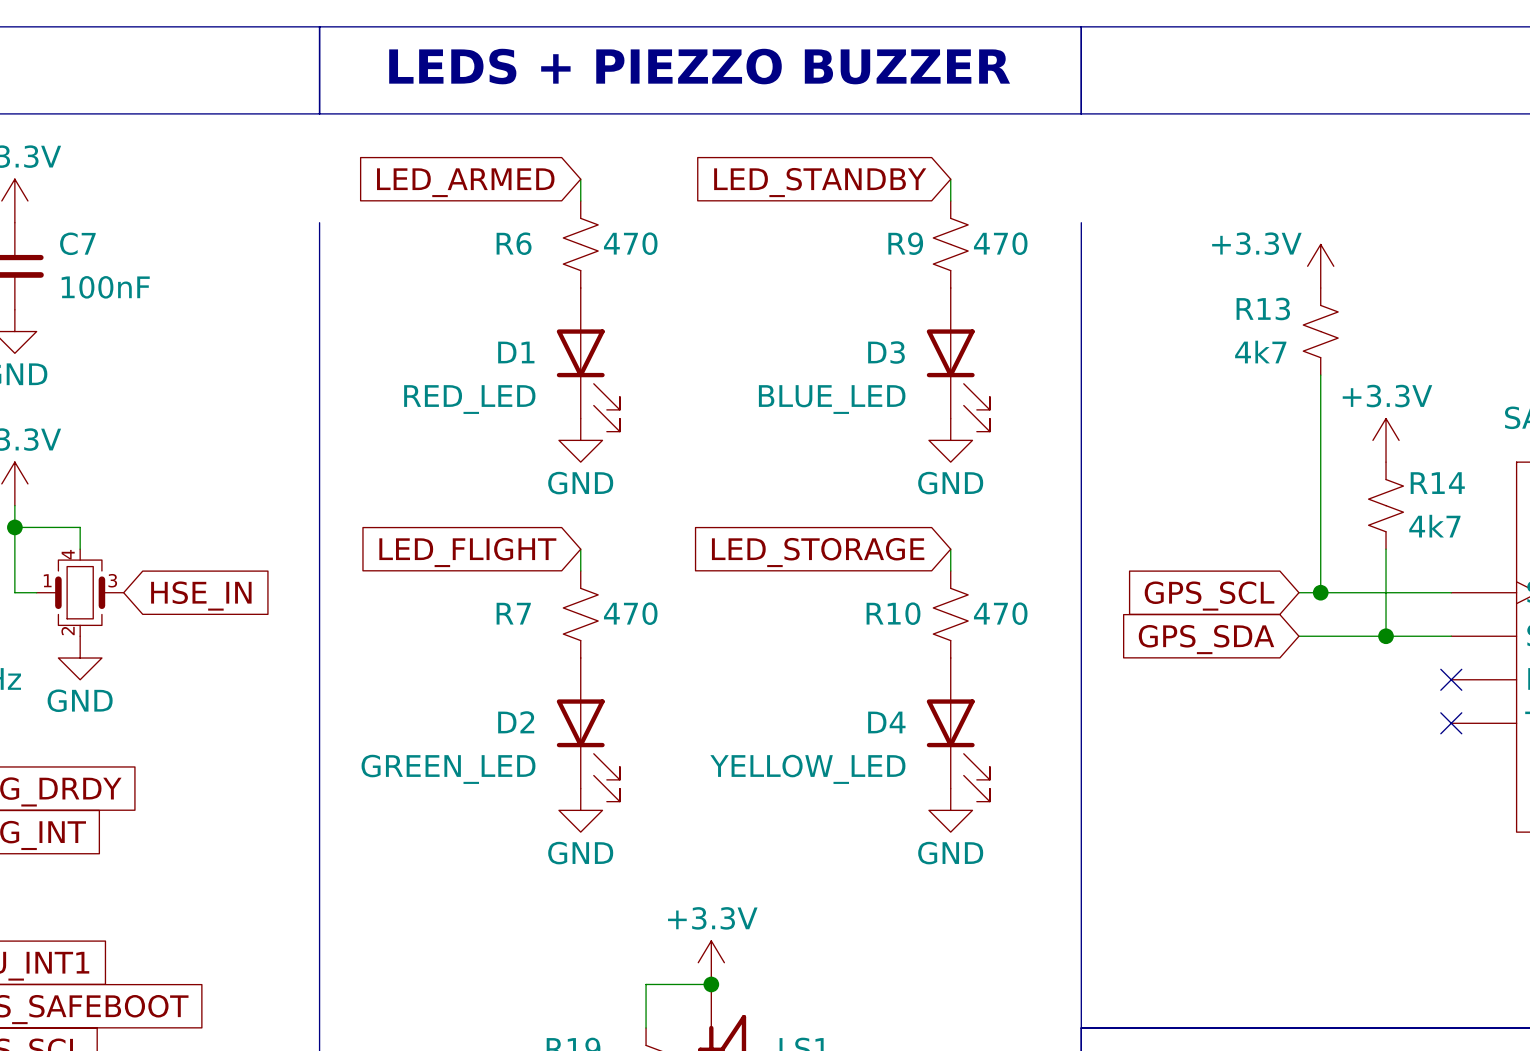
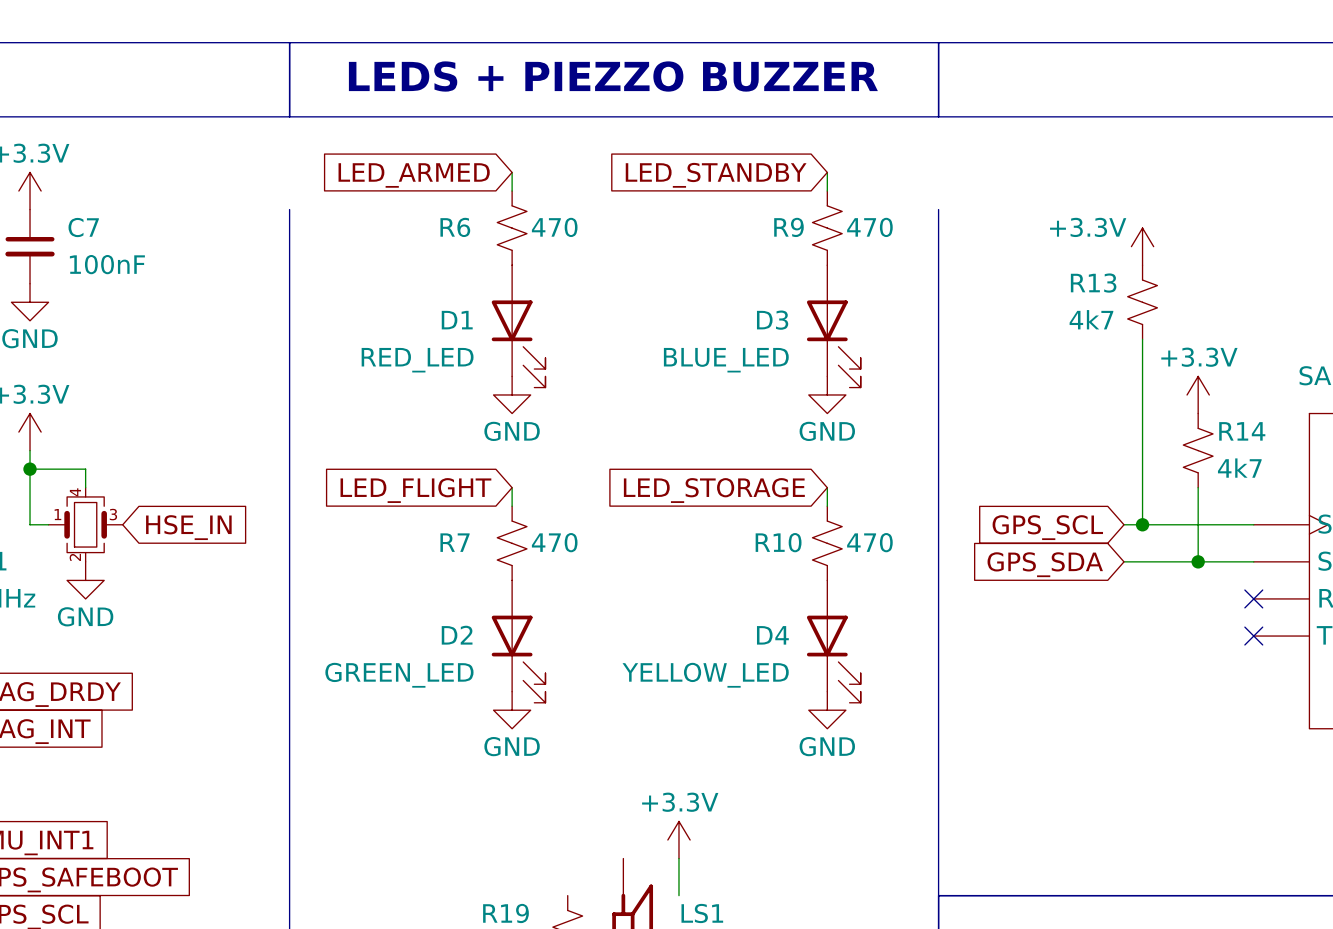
power symbol position: +3.3V (711, 962) -> +3.3V (678, 840)
wire: (711, 984) (646, 984) (646, 1028) -> none
junction: (711, 984) -> none
wire: none -> (678, 858) (678, 895)

